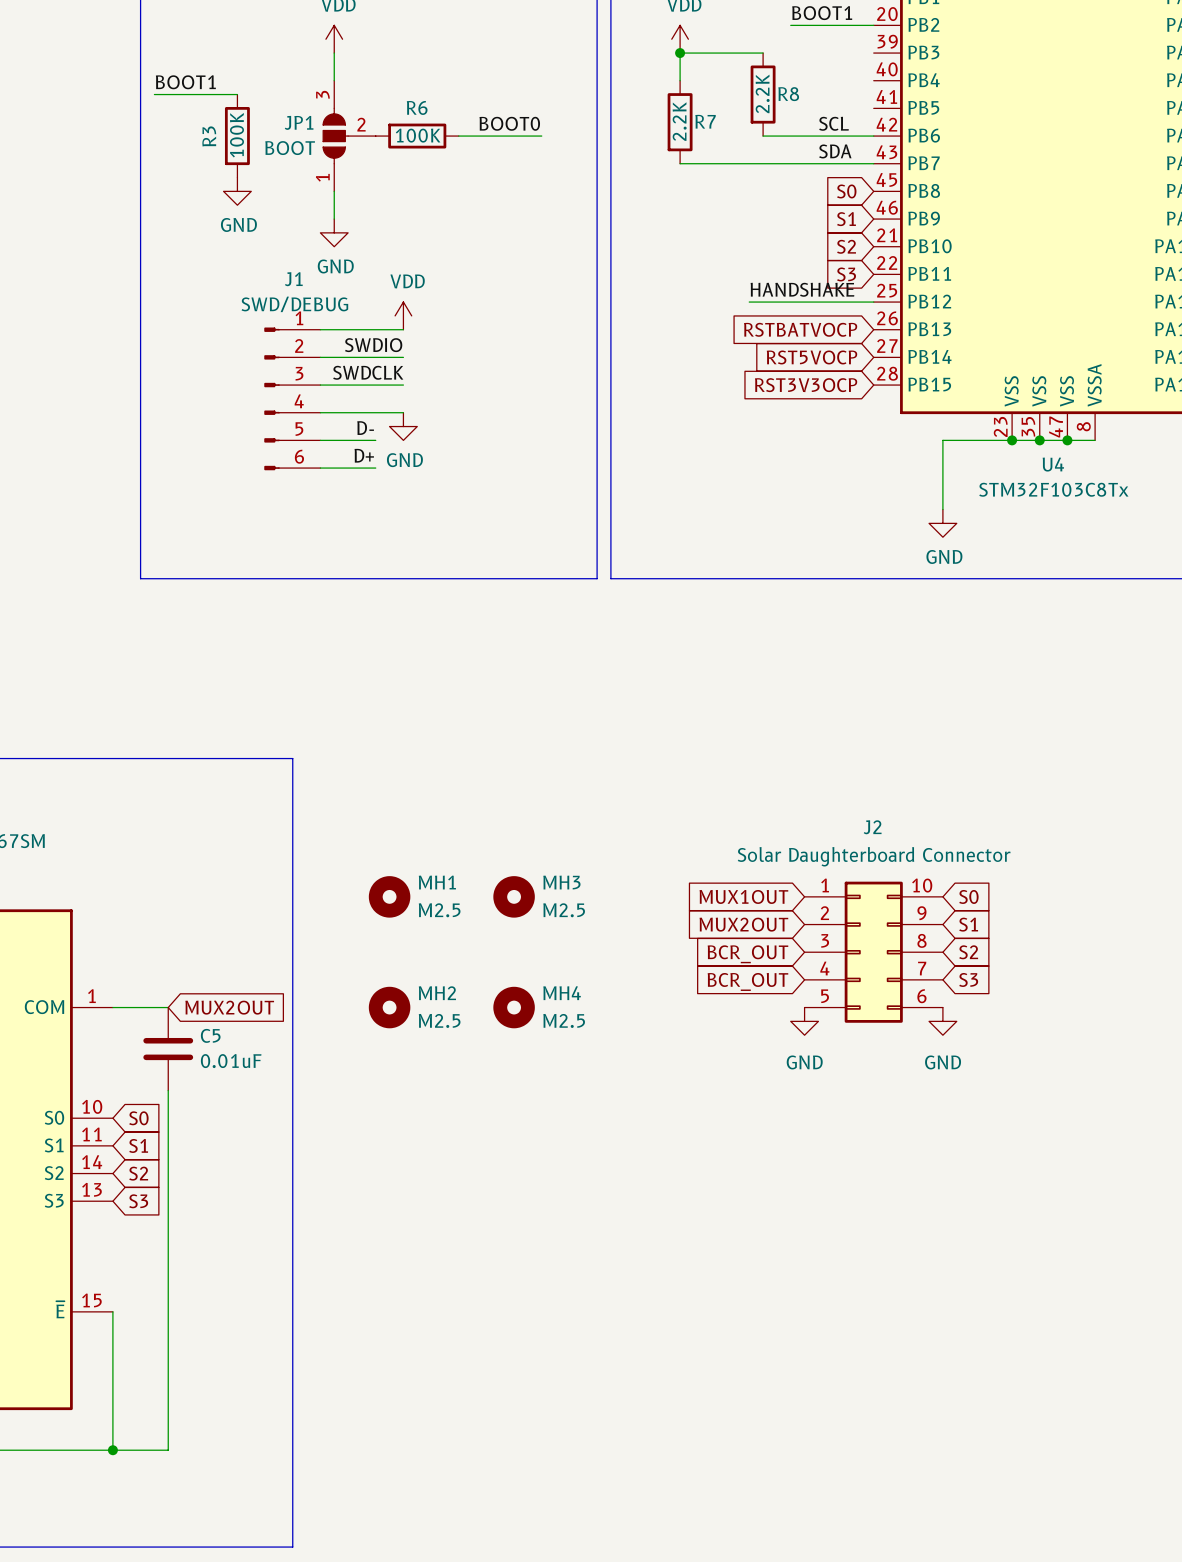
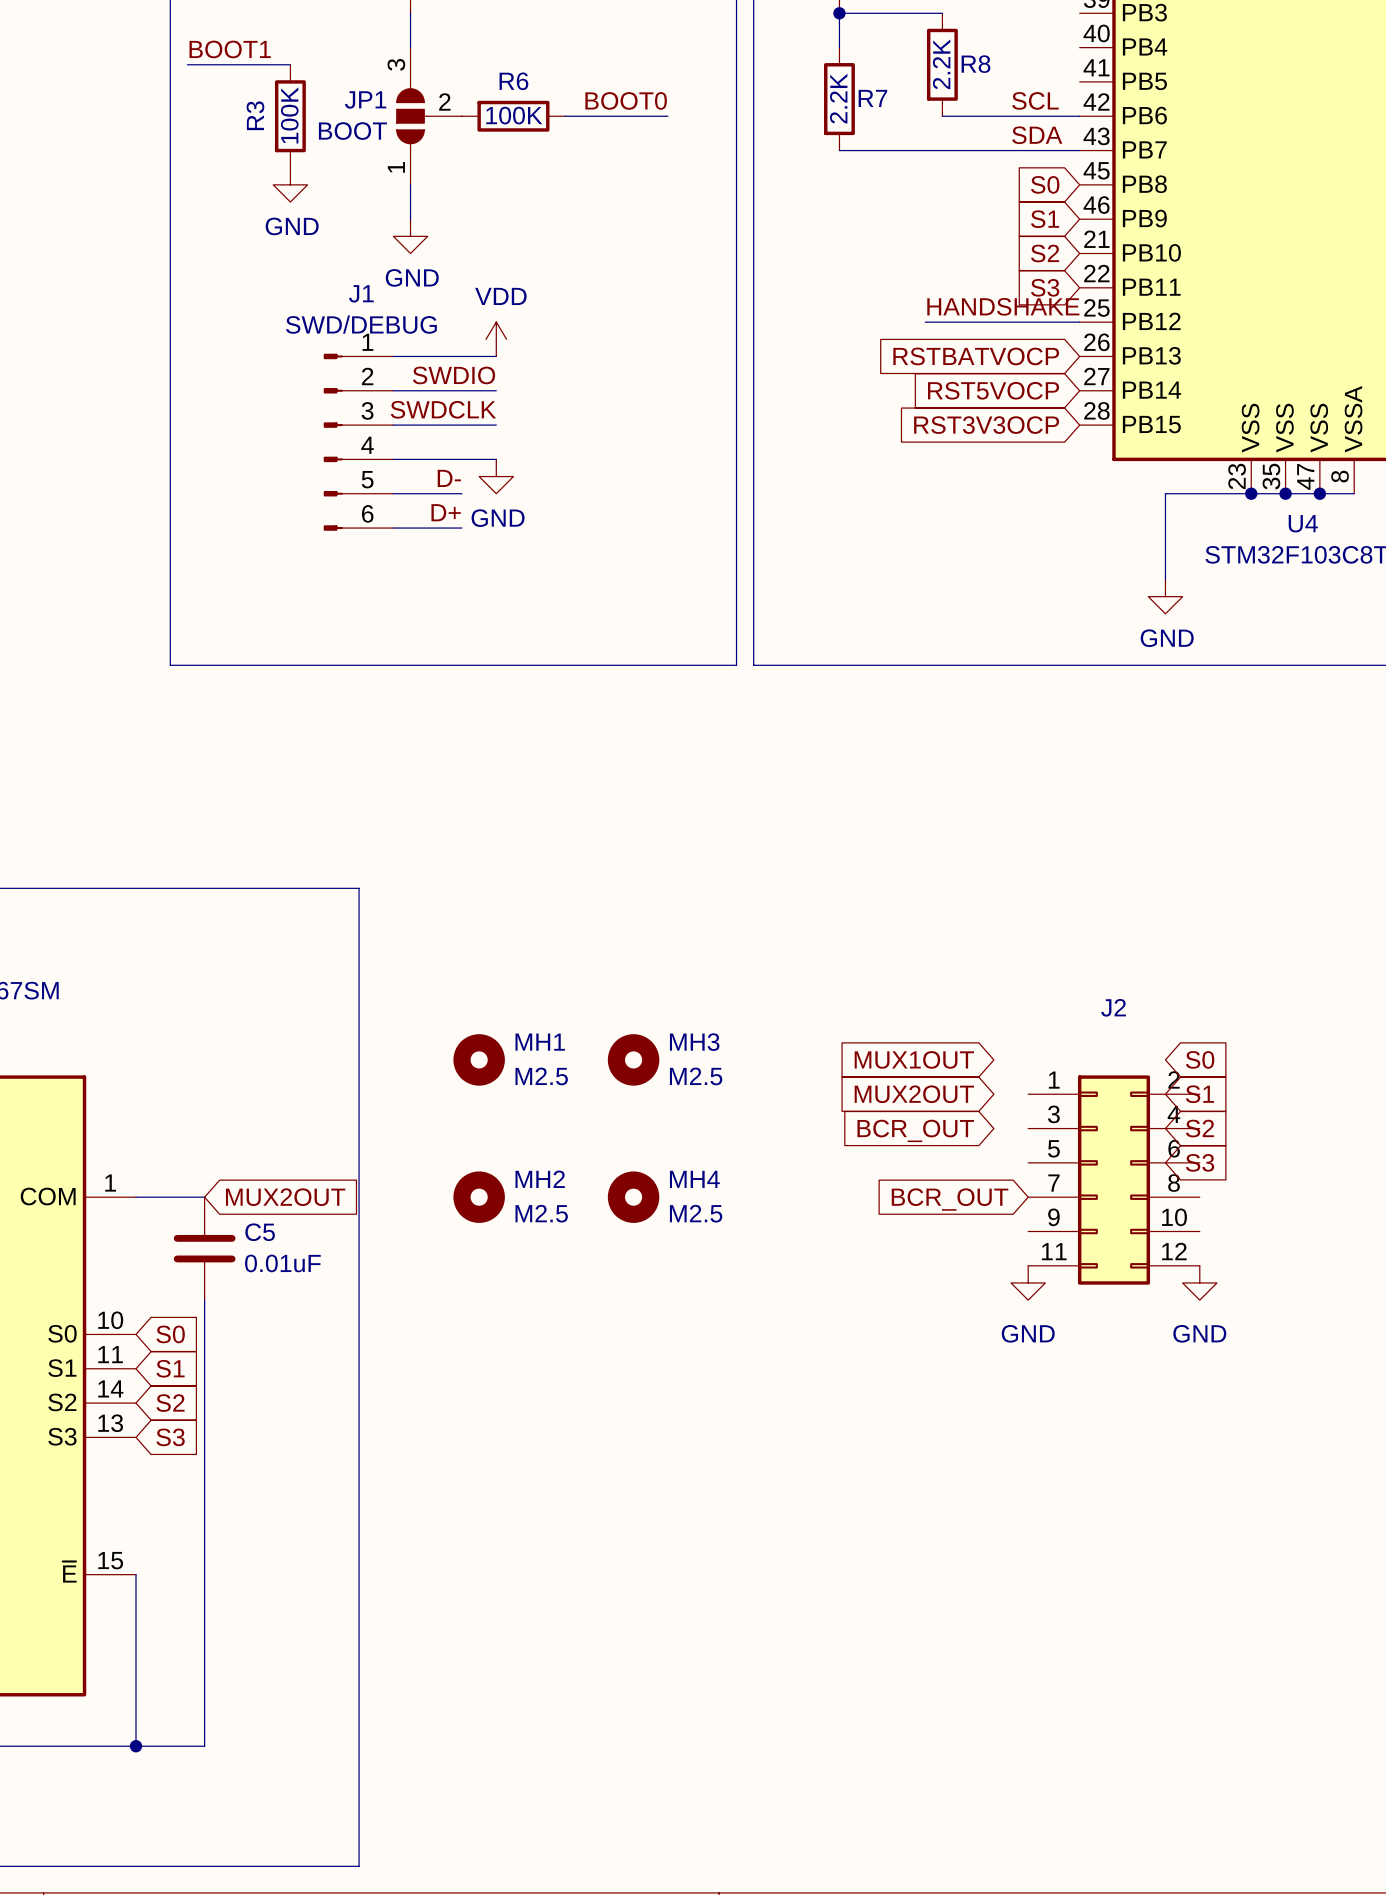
J2 value: Solar Daughterboard Connector (874, 856) -> none
J2 symbol: [804, 881, 943, 1023] -> [1028, 1075, 1200, 1285]
global label position: BCR_OUT (747, 981) -> BCR_OUT (950, 1199)
power symbol: GND (804, 1021) -> none
power symbol: GND (942, 1021) -> none
power symbol: none -> GND (1028, 1282)
power symbol: none -> GND (1199, 1282)

